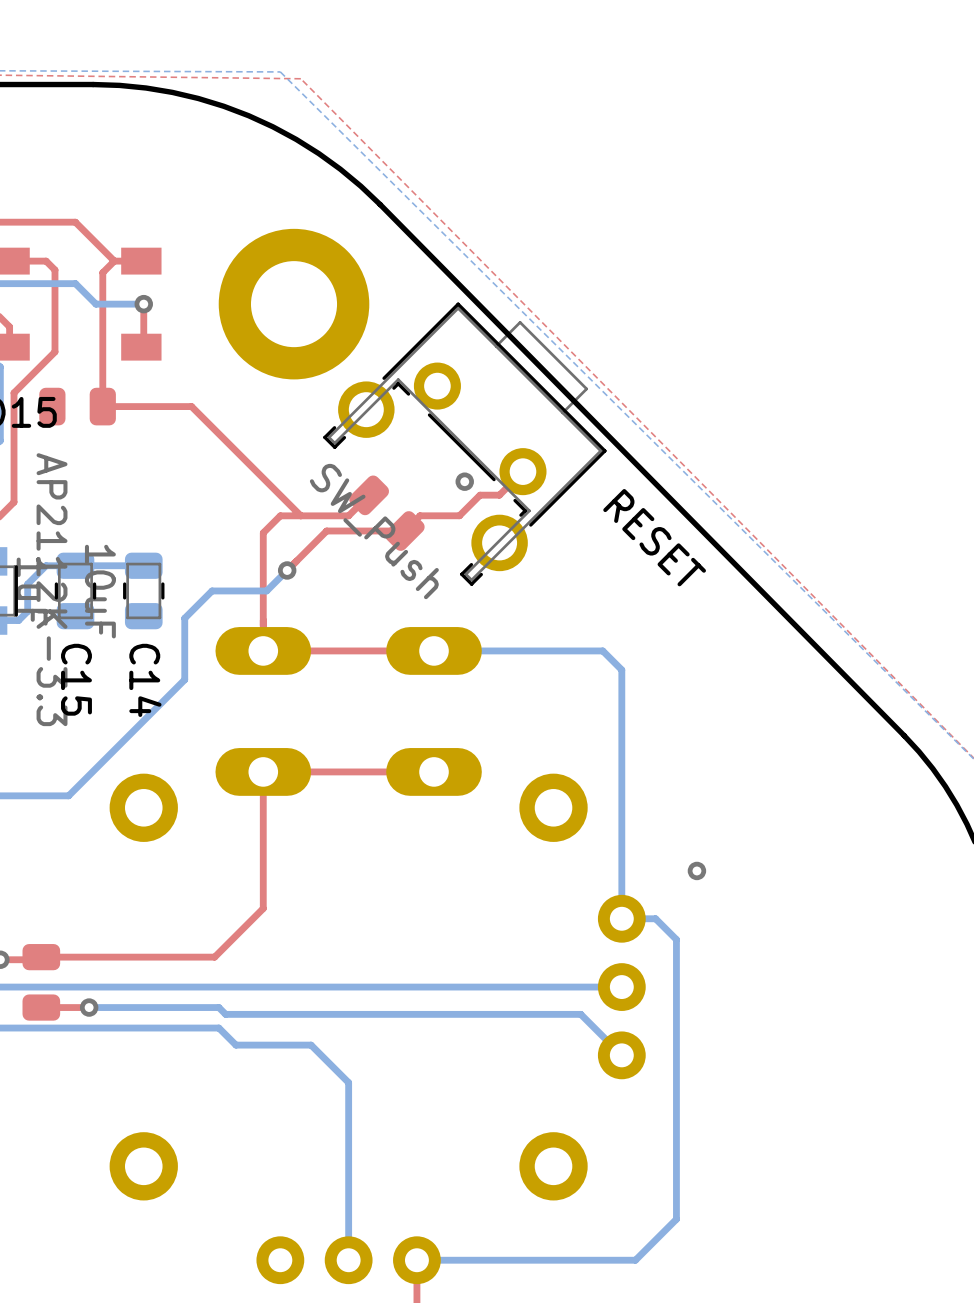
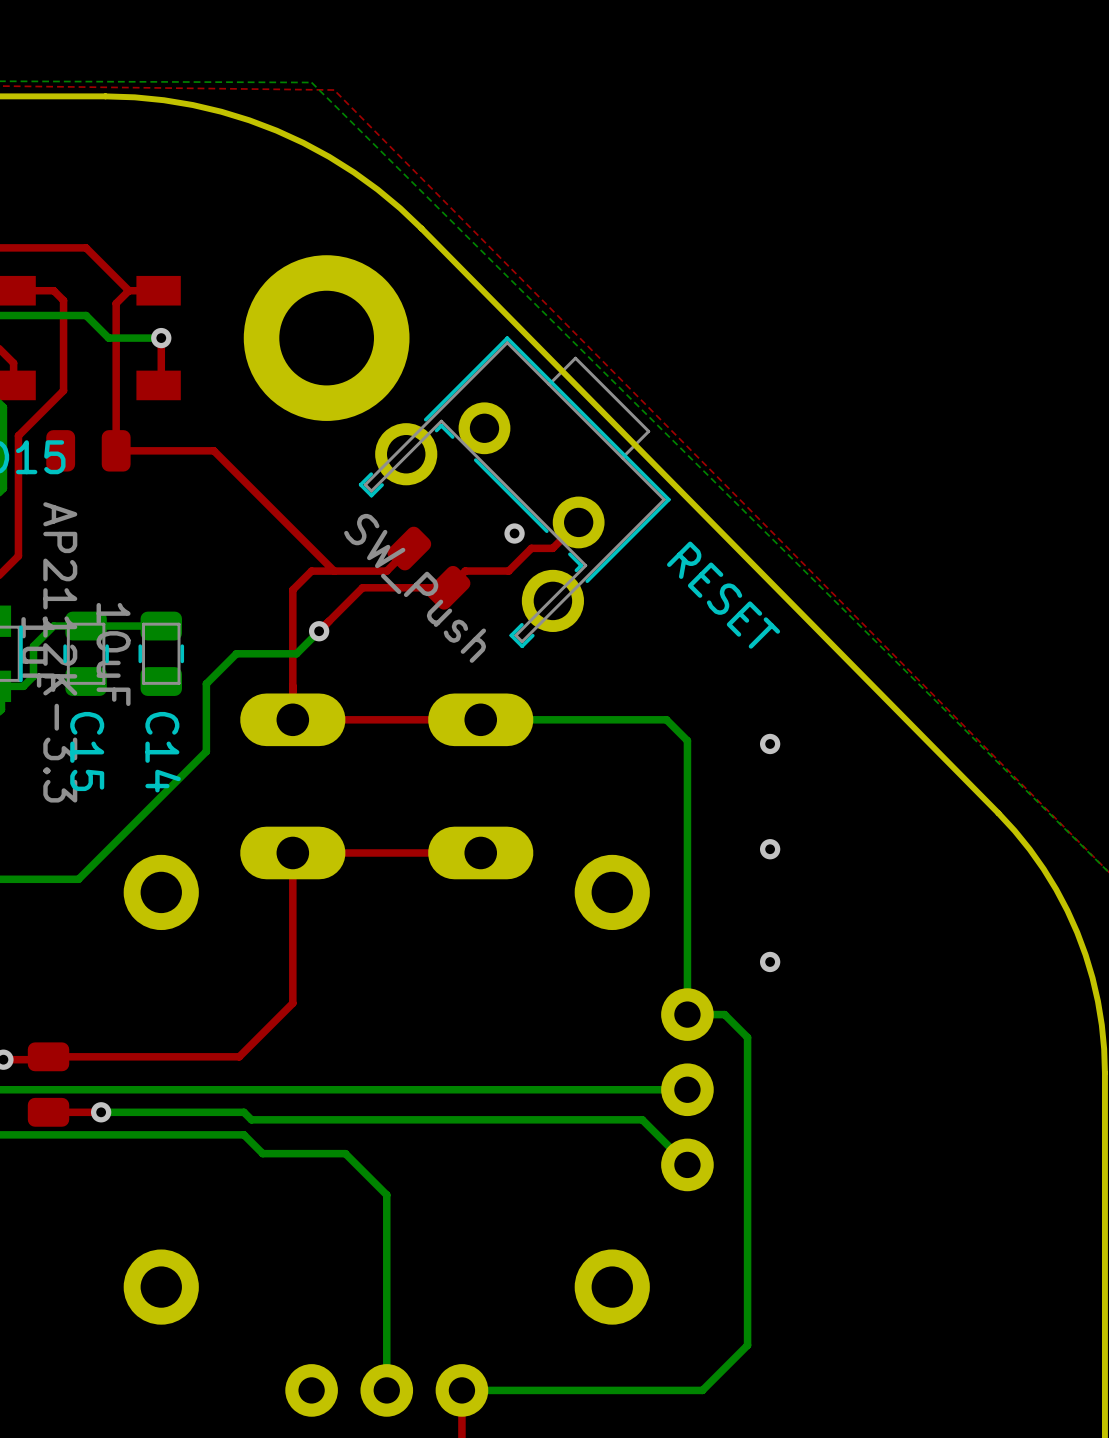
via: none -> (770, 743)
via: none -> (770, 849)

